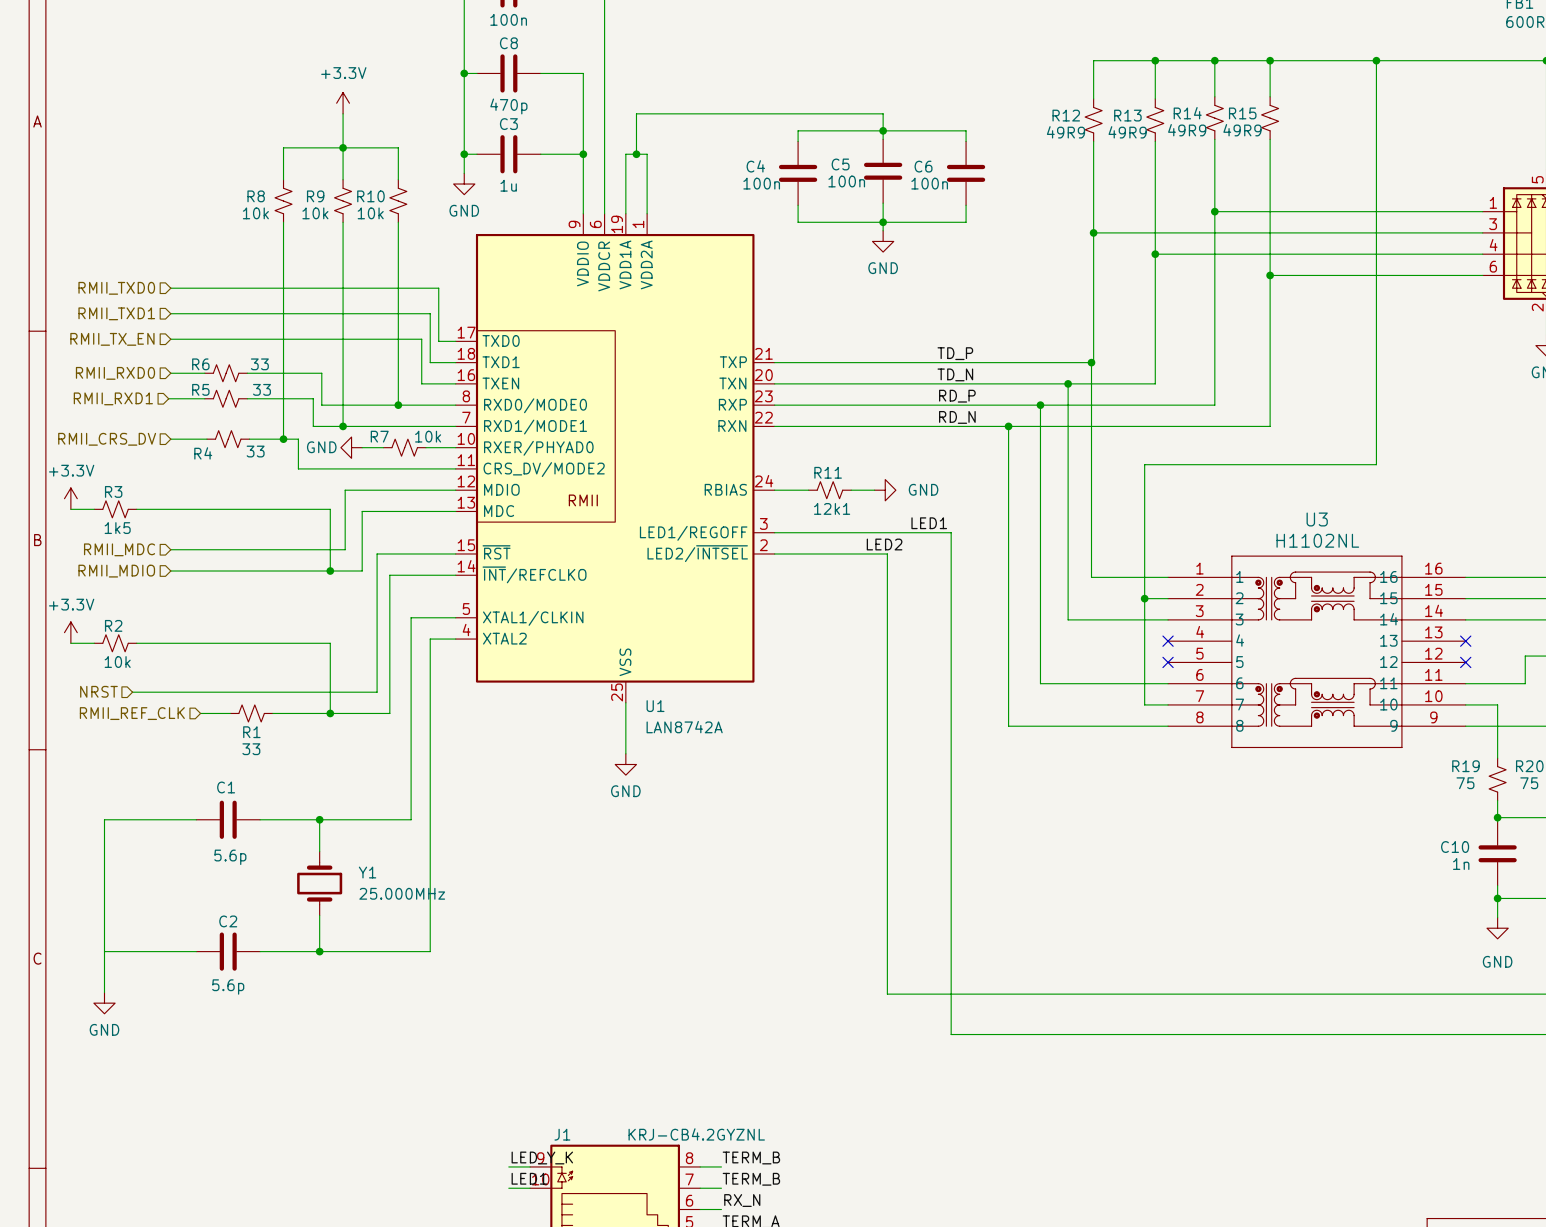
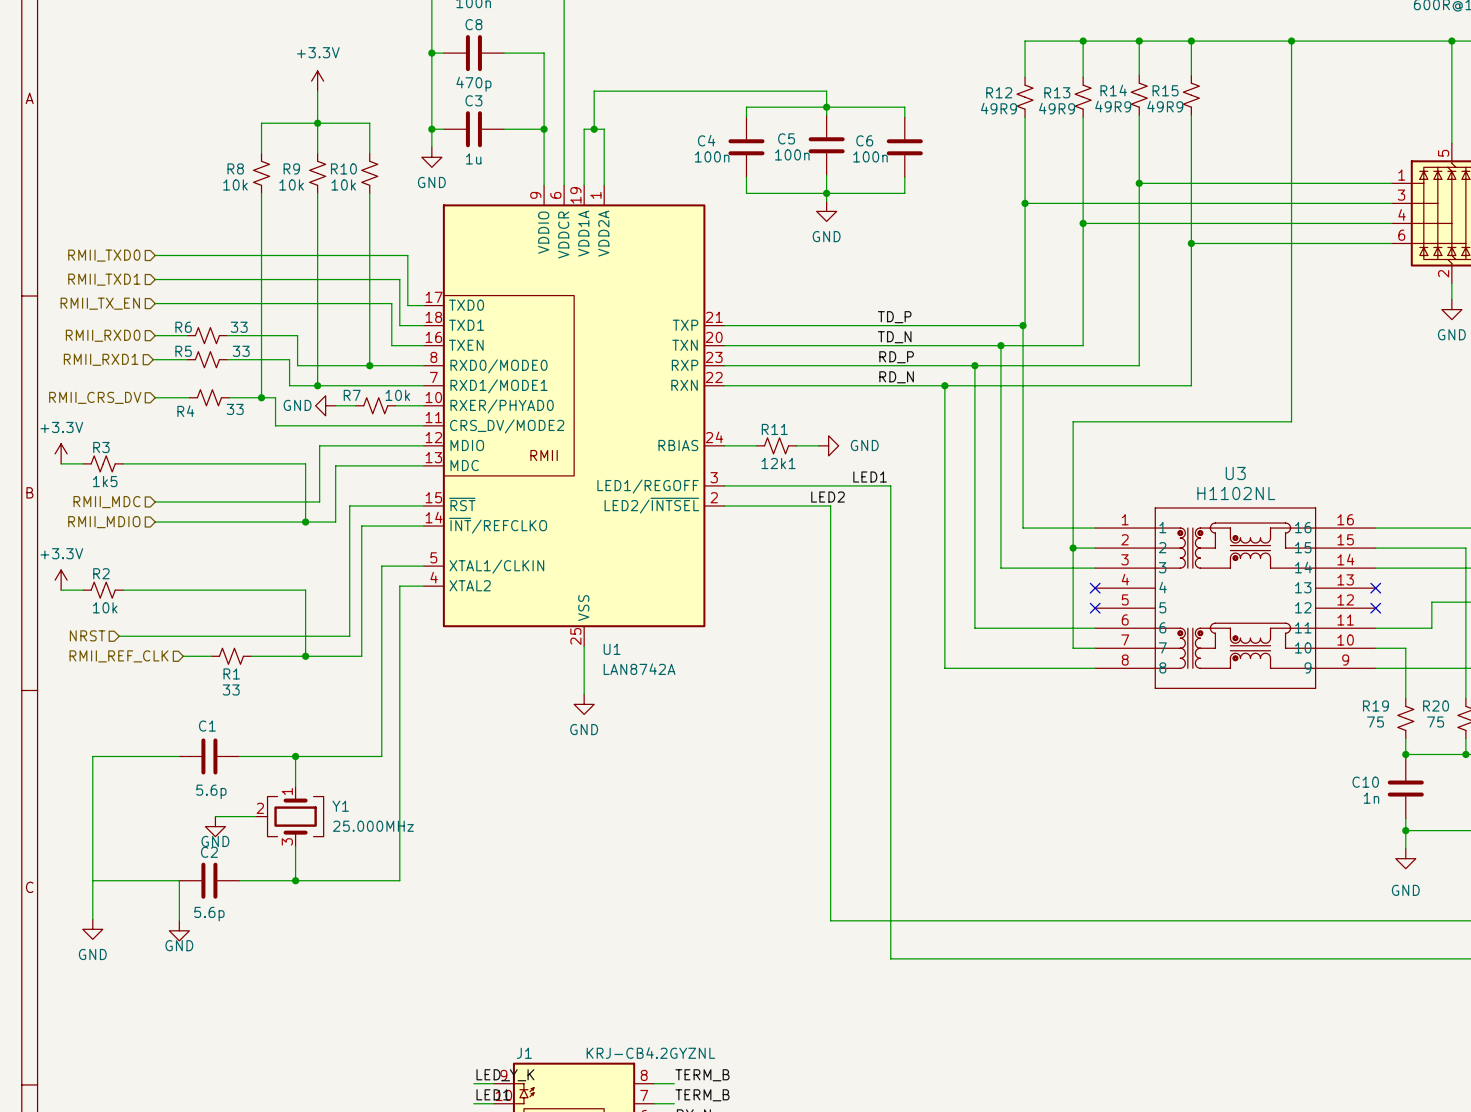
Y1 symbol: [297, 851, 343, 916] -> [255, 786, 324, 847]
wire: none -> (215, 816) (255, 816)
power symbol: none -> GND (215, 826)
wire: none -> (179, 880) (179, 920)
power symbol: none -> GND (179, 930)

